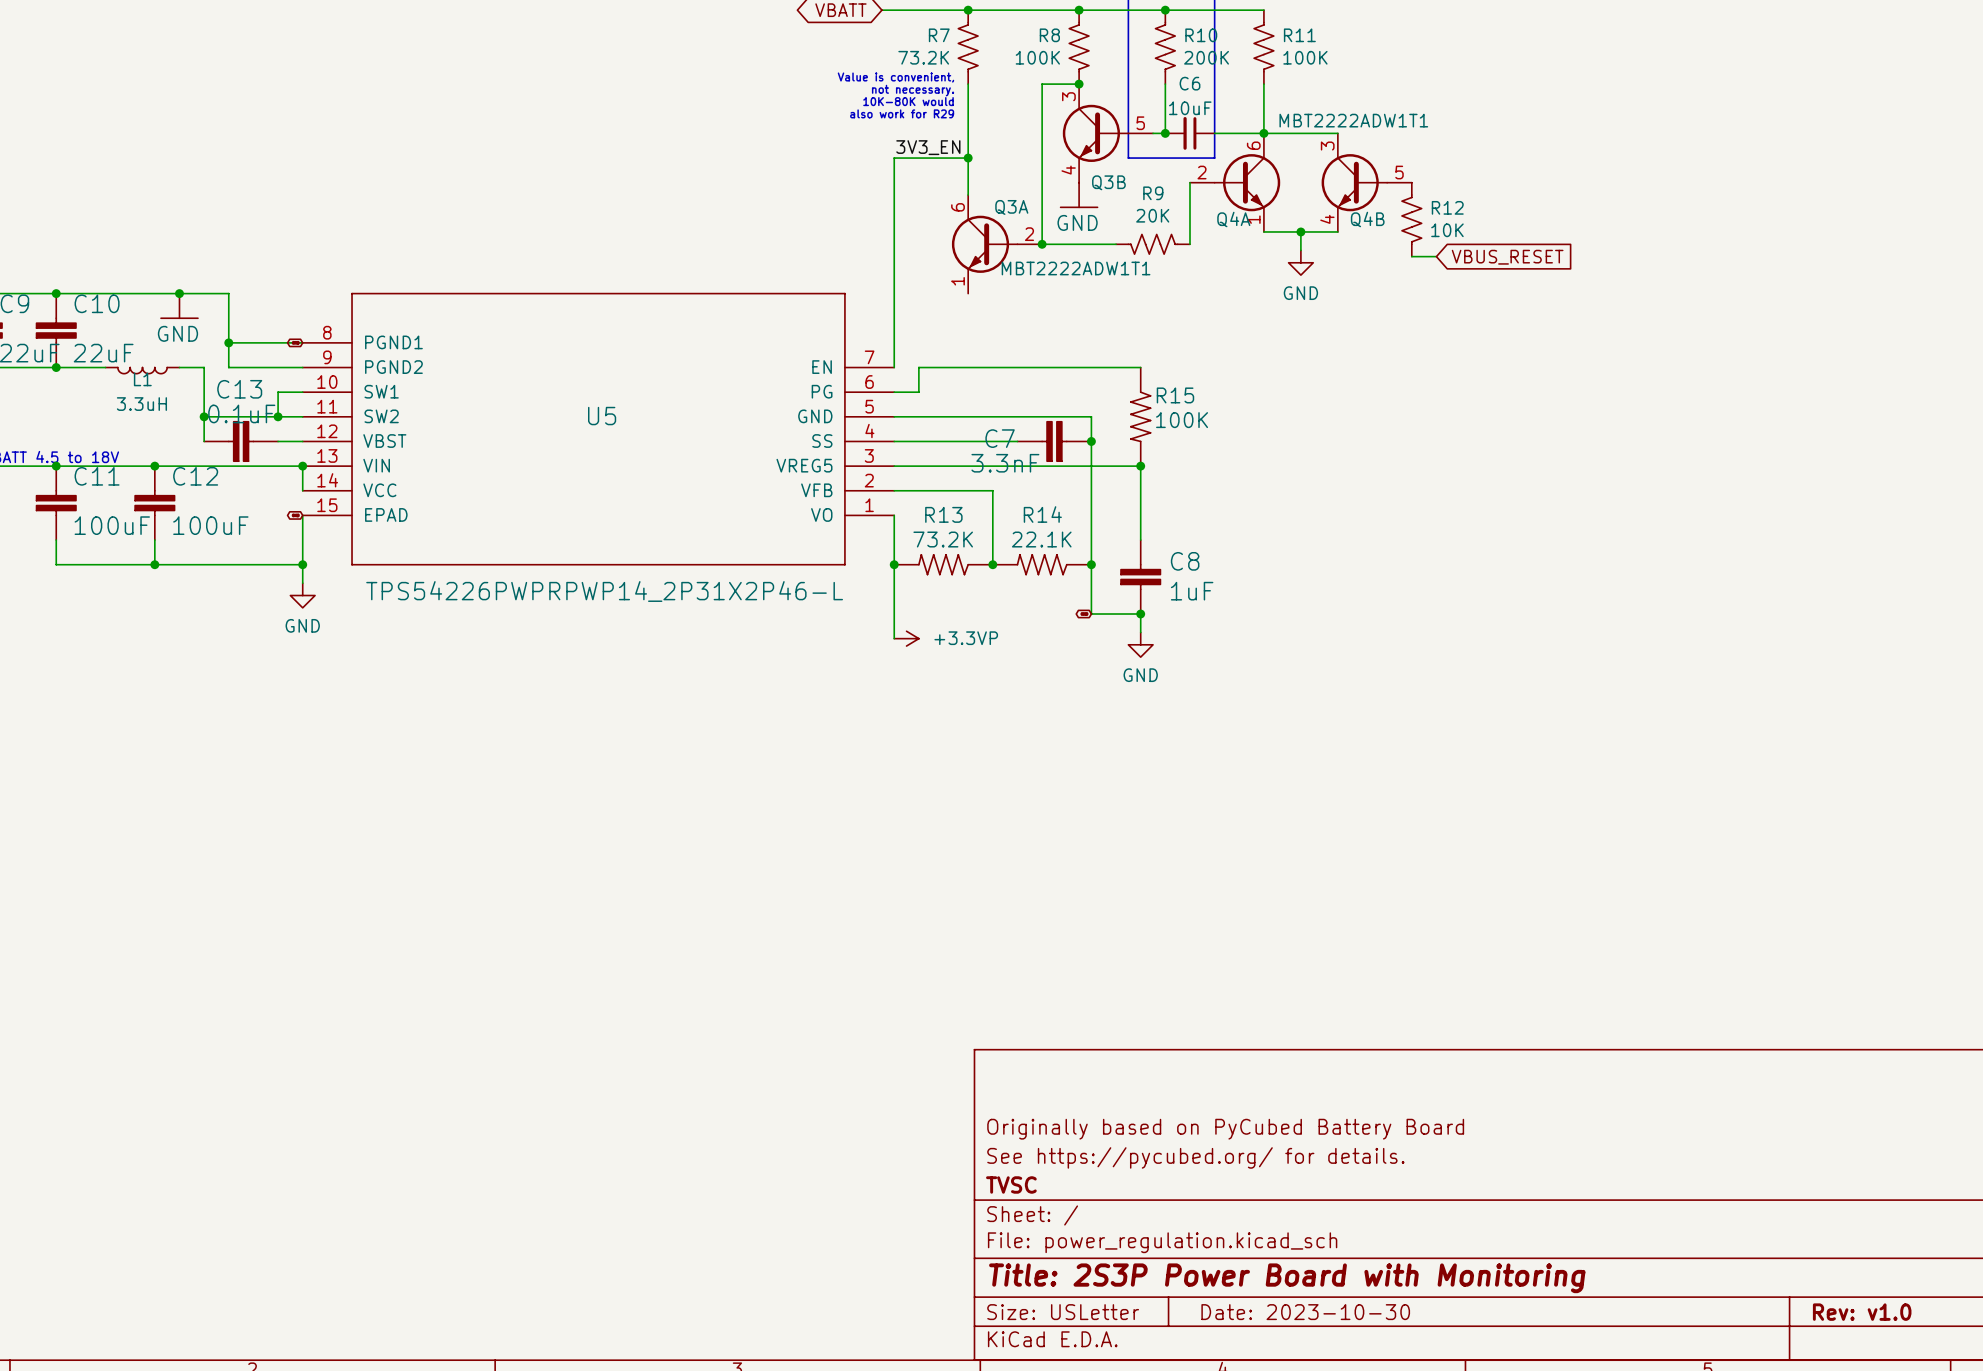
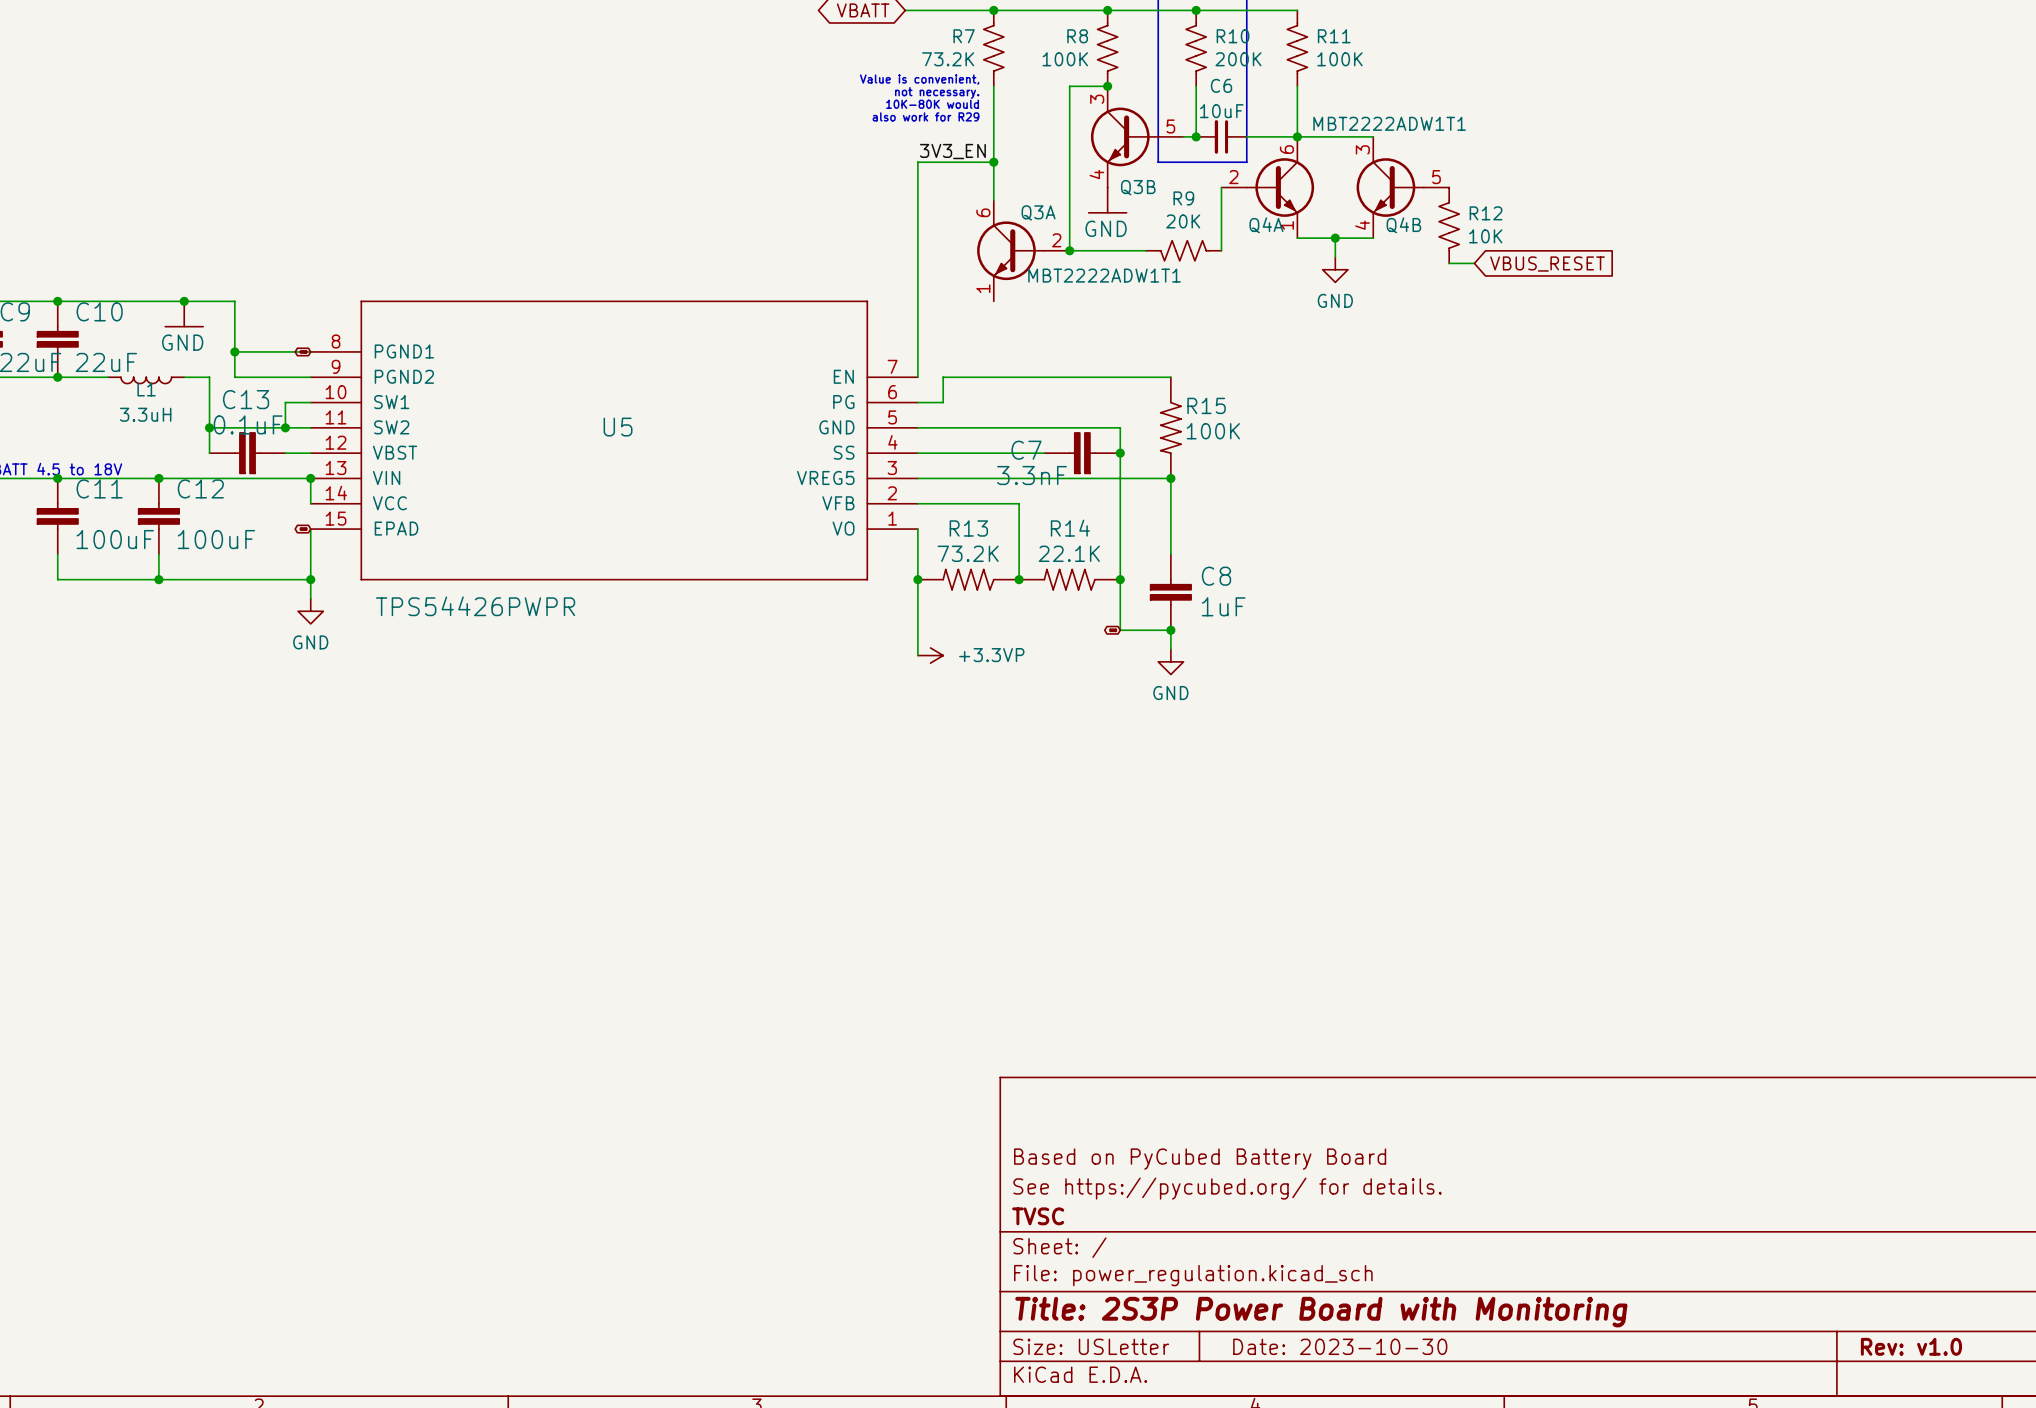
U5 value: TPS54226PWPRPWP14_2P31X2P46-L (604, 591) -> TPS54426PWPR (475, 606)
title block: Originally based on PyCubed Battery Board (1225, 1129) -> Based on PyCubed Battery Board (1200, 1159)

